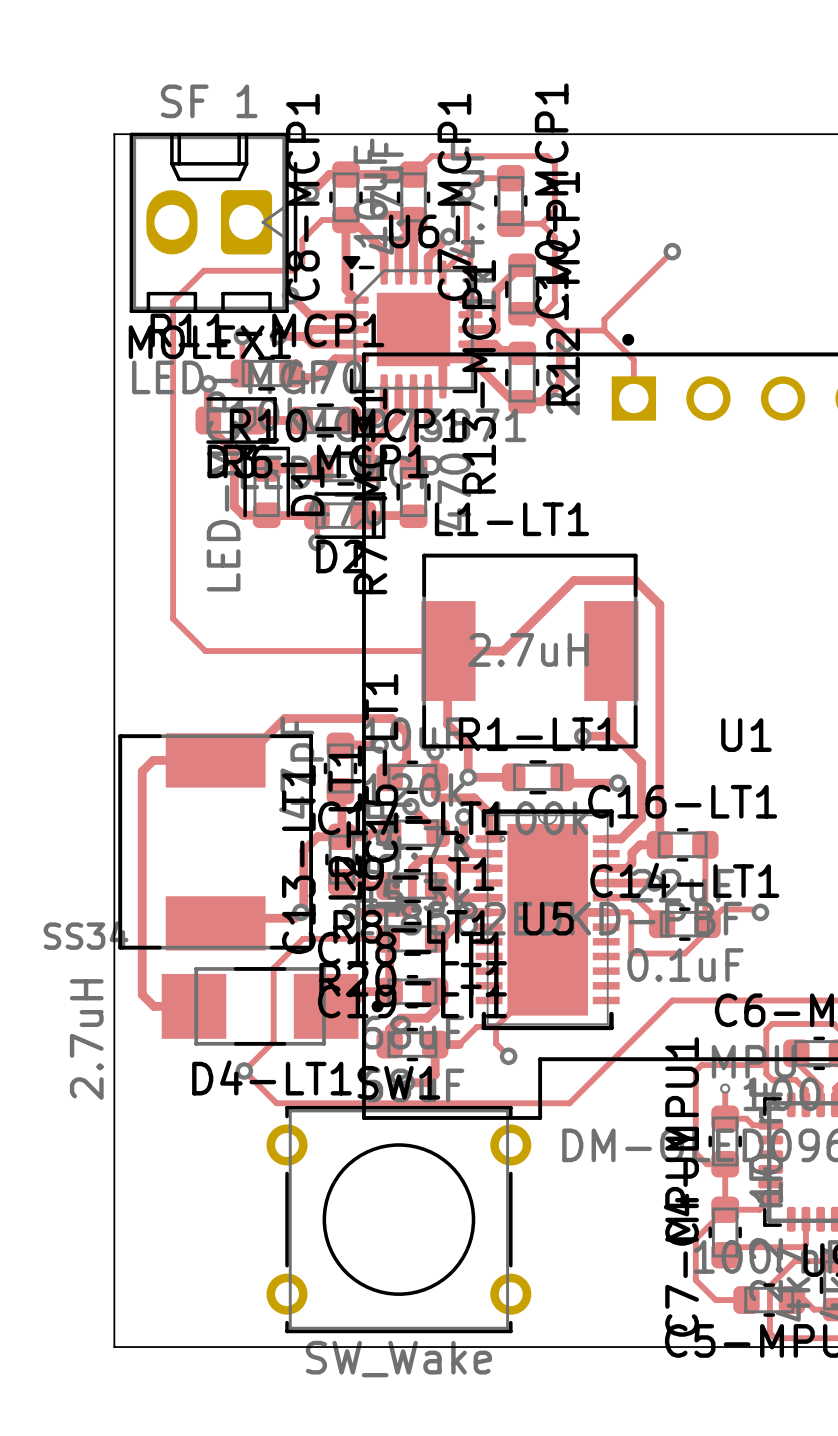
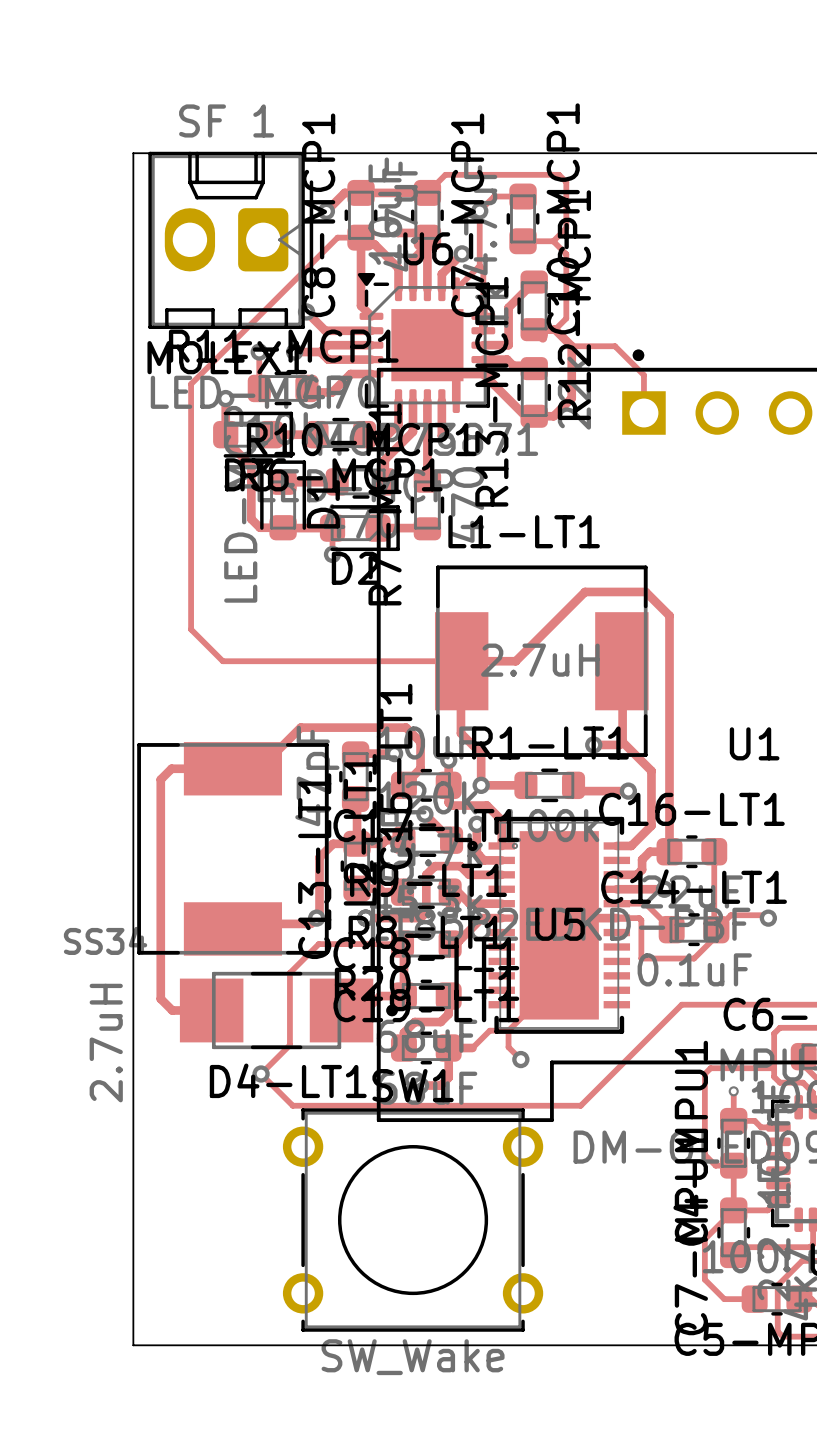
track: (302, 239) (302, 263) (294, 270) (203, 270) (173, 301) (173, 369) -> (318, 257) (191, 384)
track: (672, 251) (604, 319) (604, 330) -> none
via: (672, 251) -> none

